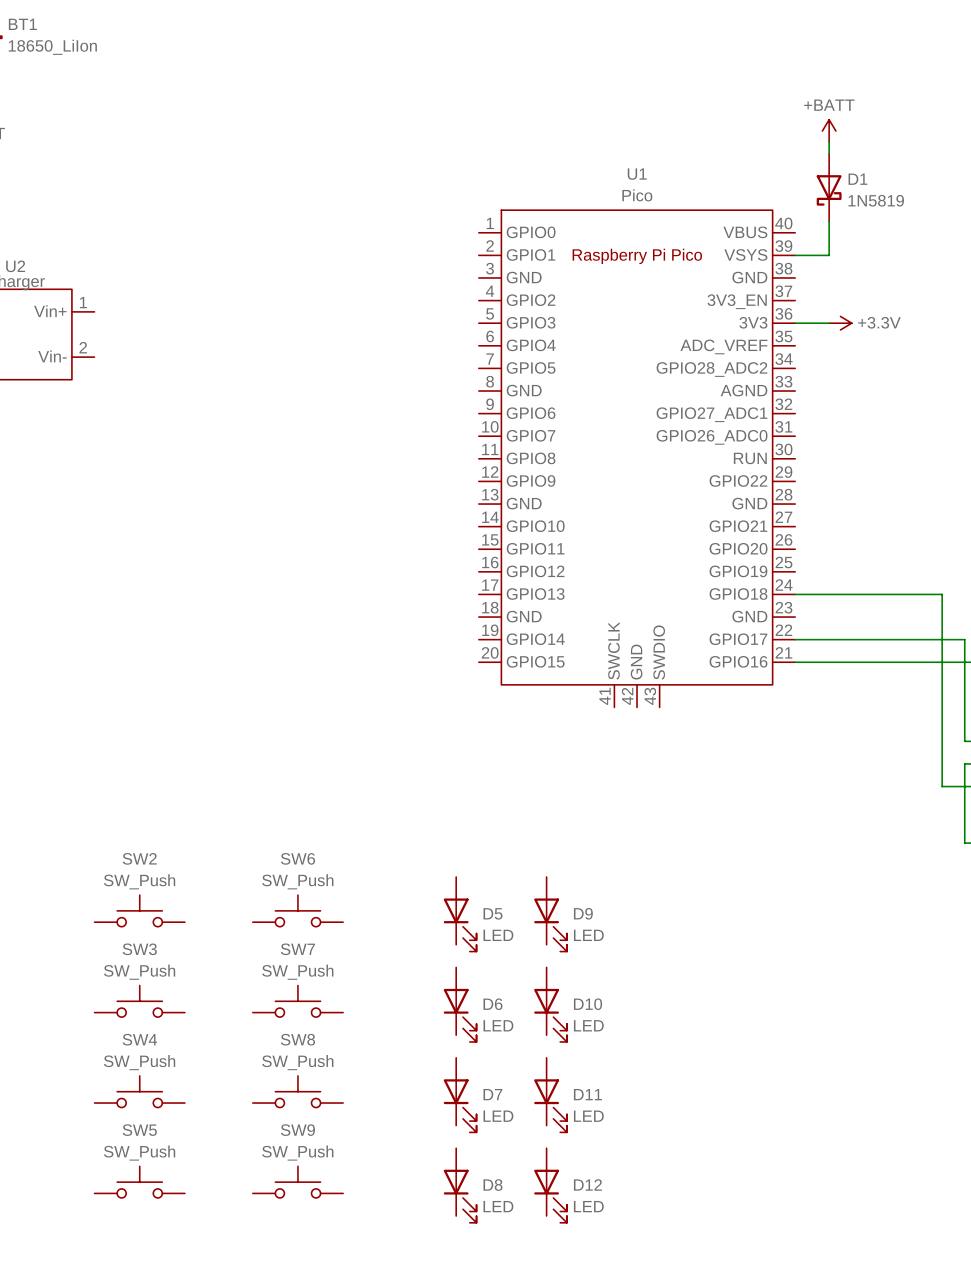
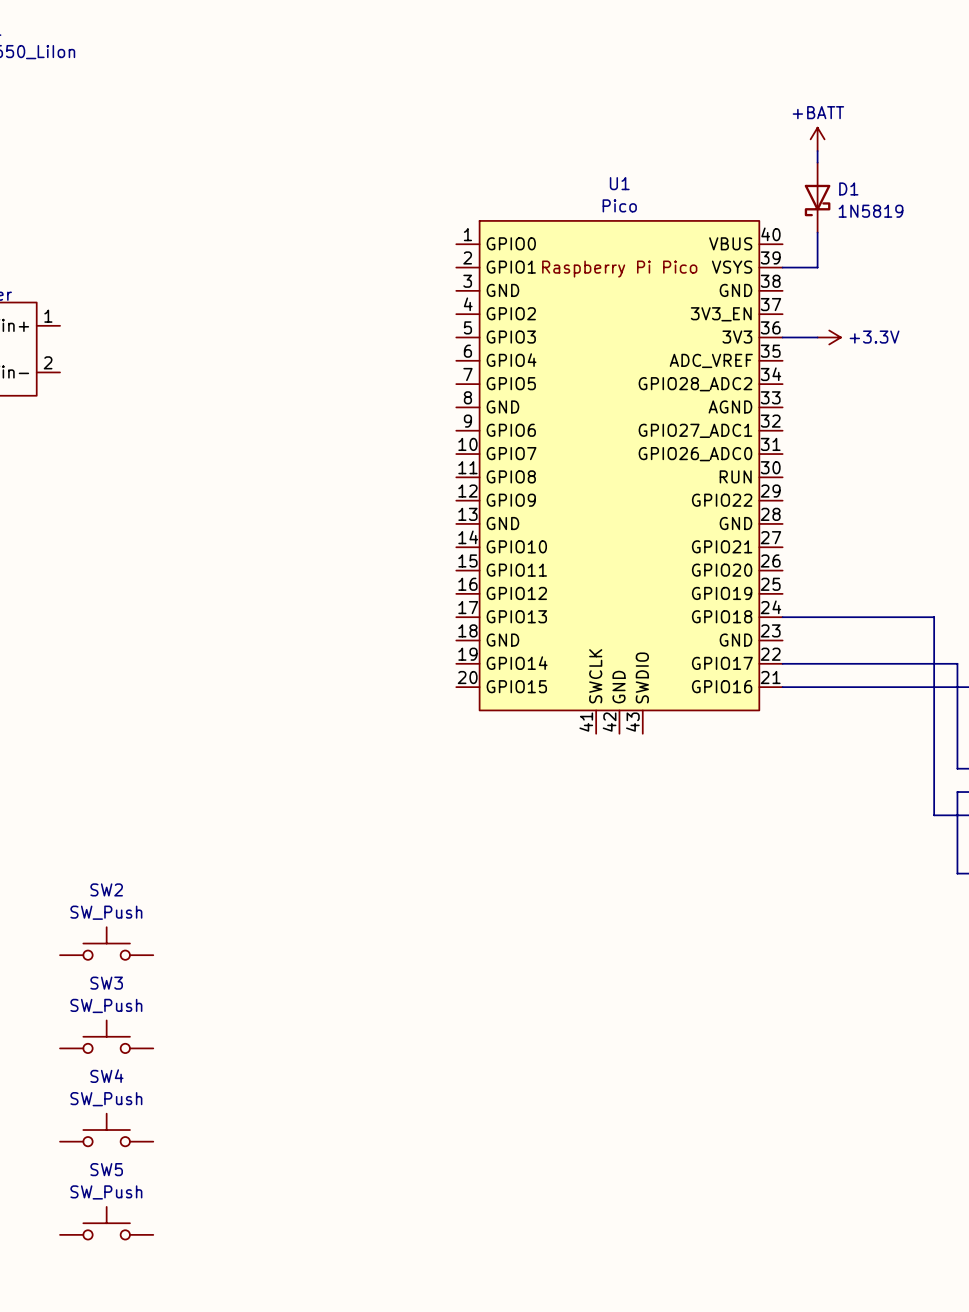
SW6: SW_Push (297, 910) -> none
D5: LED (460, 914) -> none
D9: LED (550, 914) -> none
SW7: SW_Push (297, 1001) -> none
D6: LED (460, 1004) -> none
D10: LED (550, 1004) -> none
SW8: SW_Push (297, 1091) -> none
D7: LED (460, 1095) -> none
D11: LED (550, 1095) -> none
SW9: SW_Push (297, 1182) -> none
D8: LED (460, 1185) -> none
D12: LED (550, 1185) -> none

